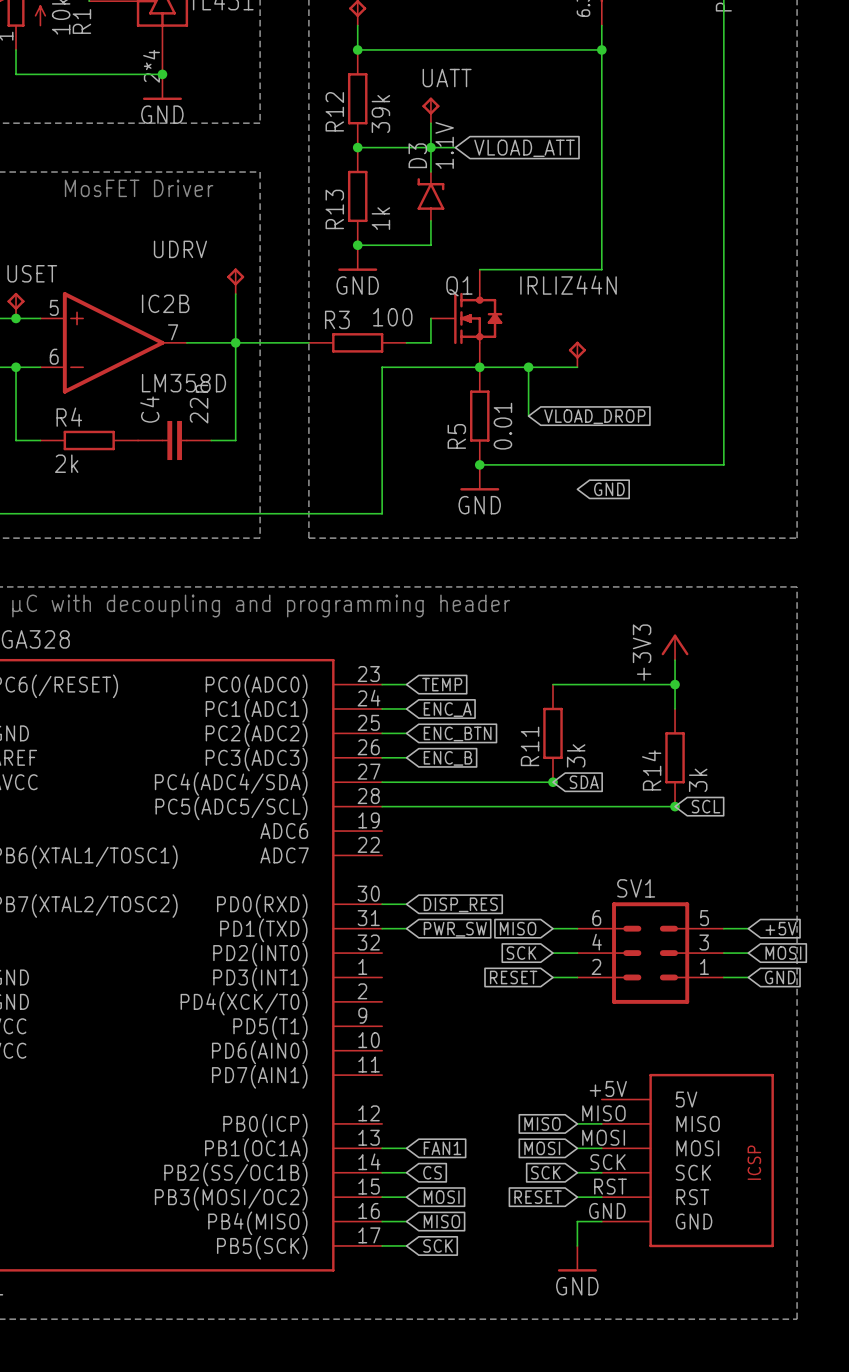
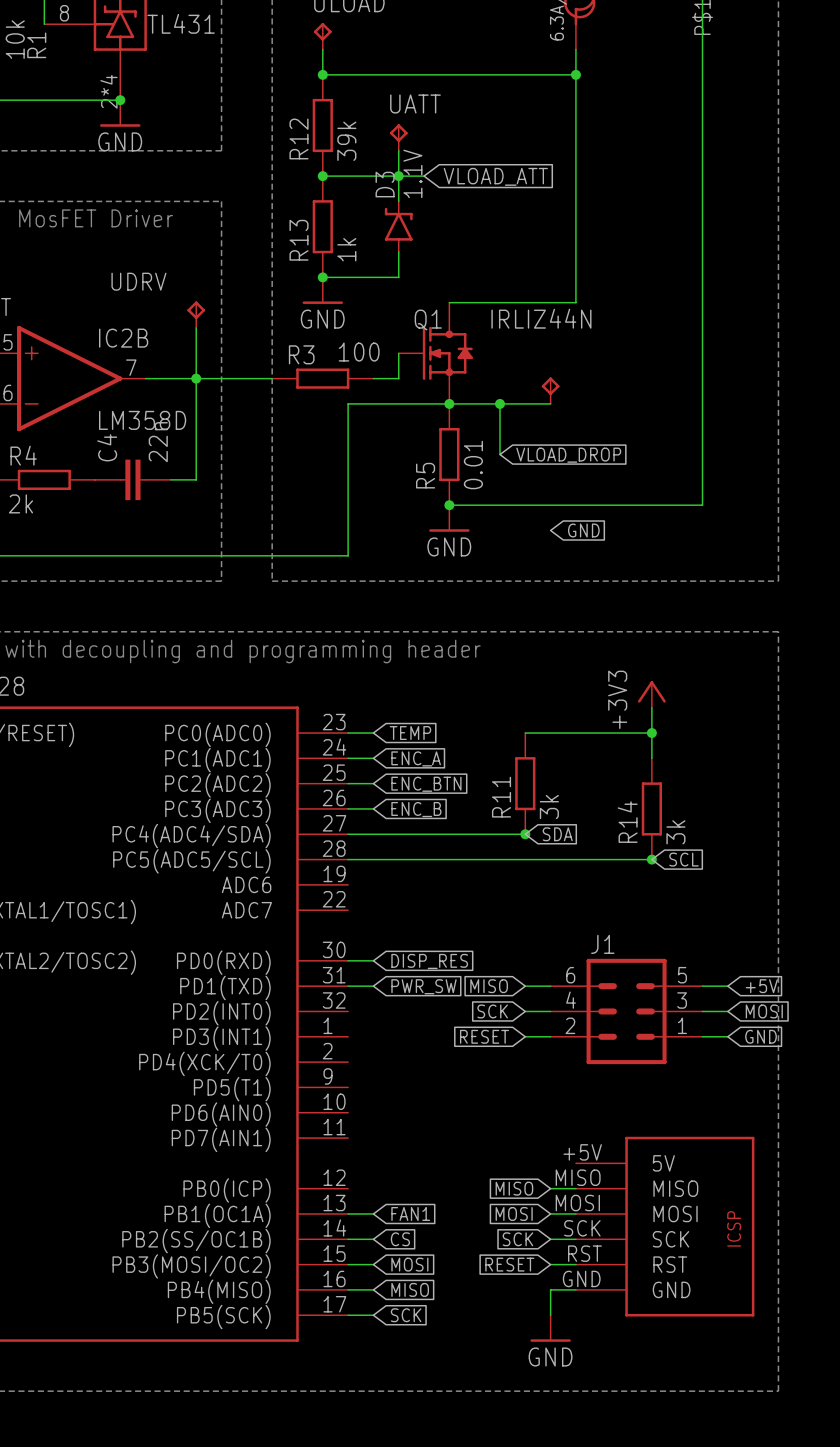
SV1 name: SV1 (636, 888) -> J1 (602, 944)

